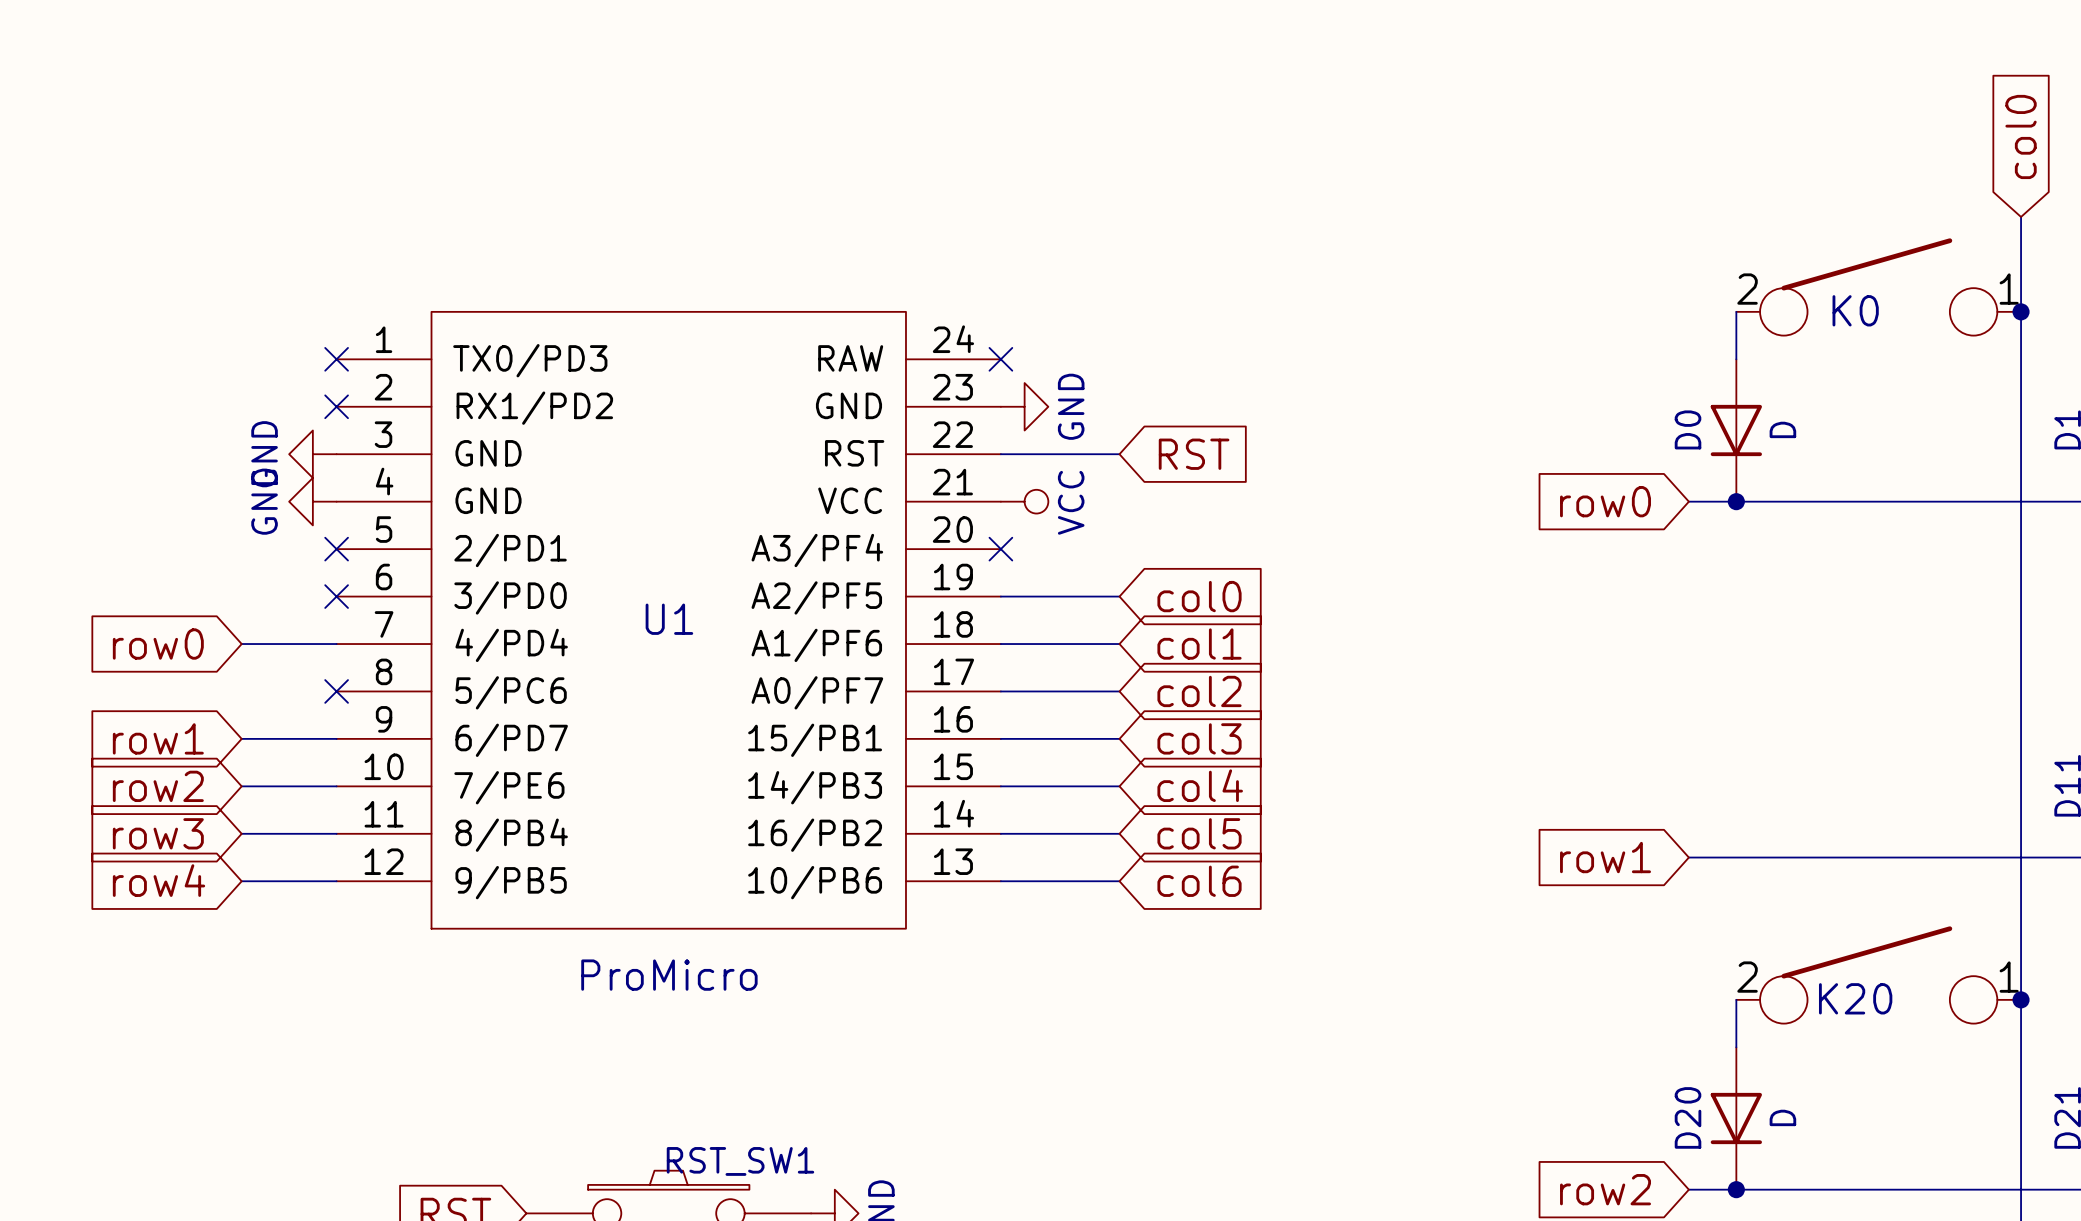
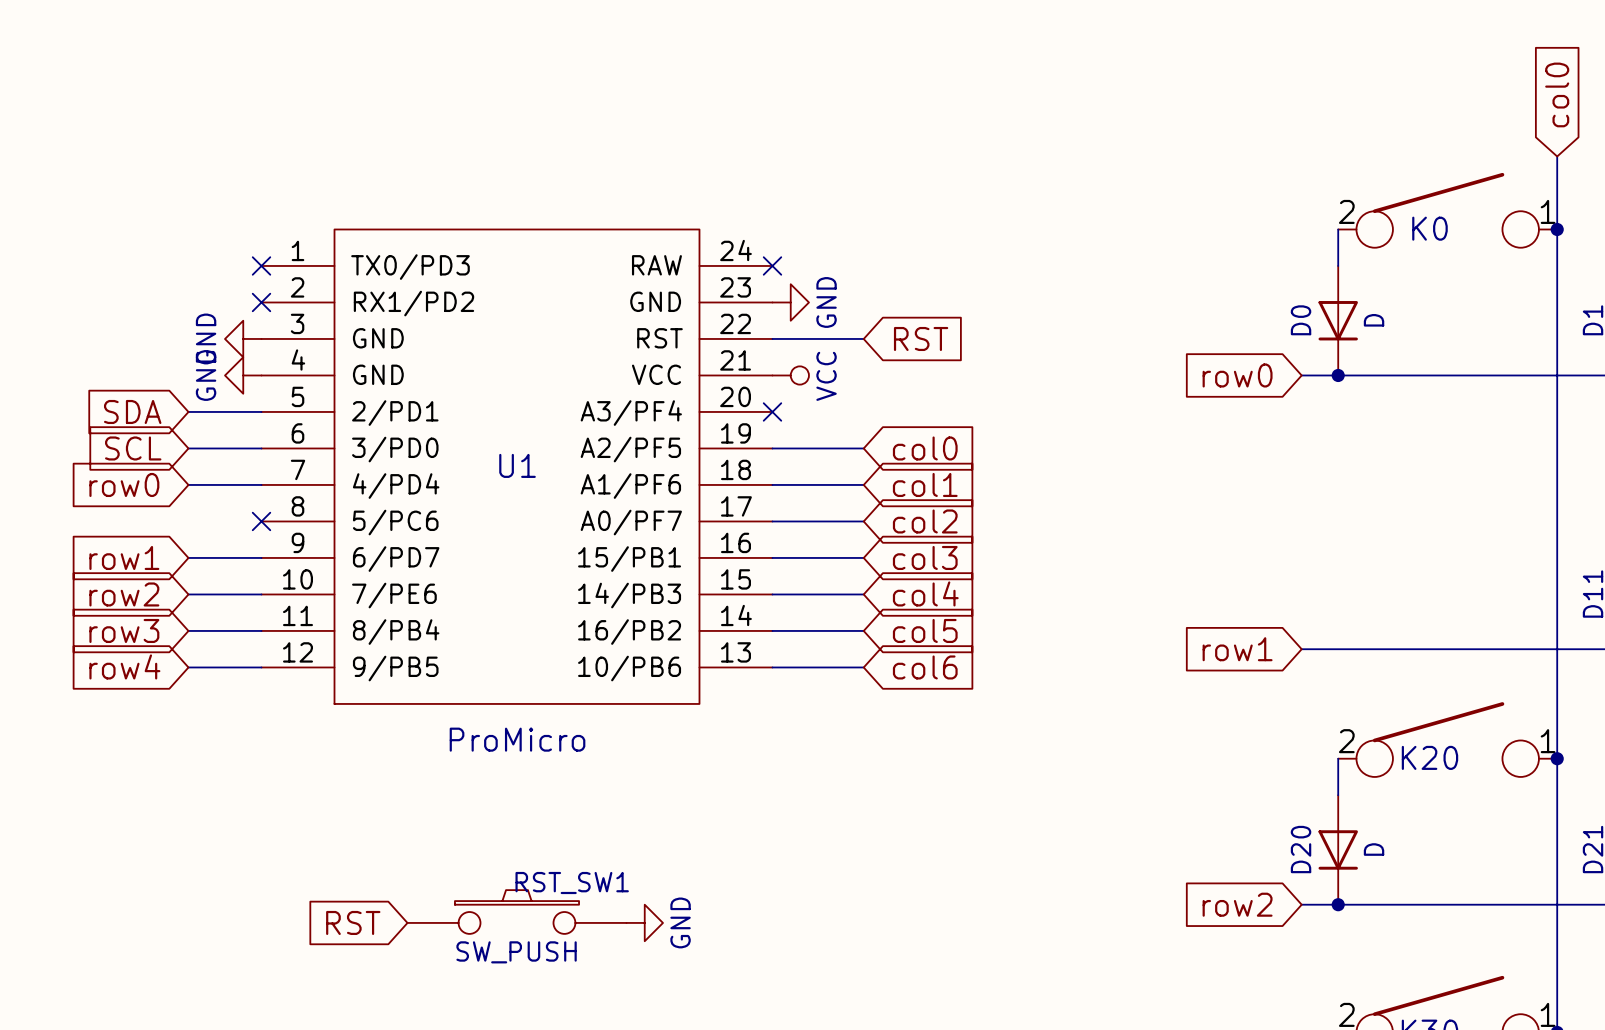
global label: none -> SDA (132, 411)
wire: none -> (188, 411) (261, 411)
no-connect mark: (336, 549) -> none
global label: none -> SCL (133, 448)
wire: none -> (188, 448) (261, 448)
no-connect mark: (336, 596) -> none

